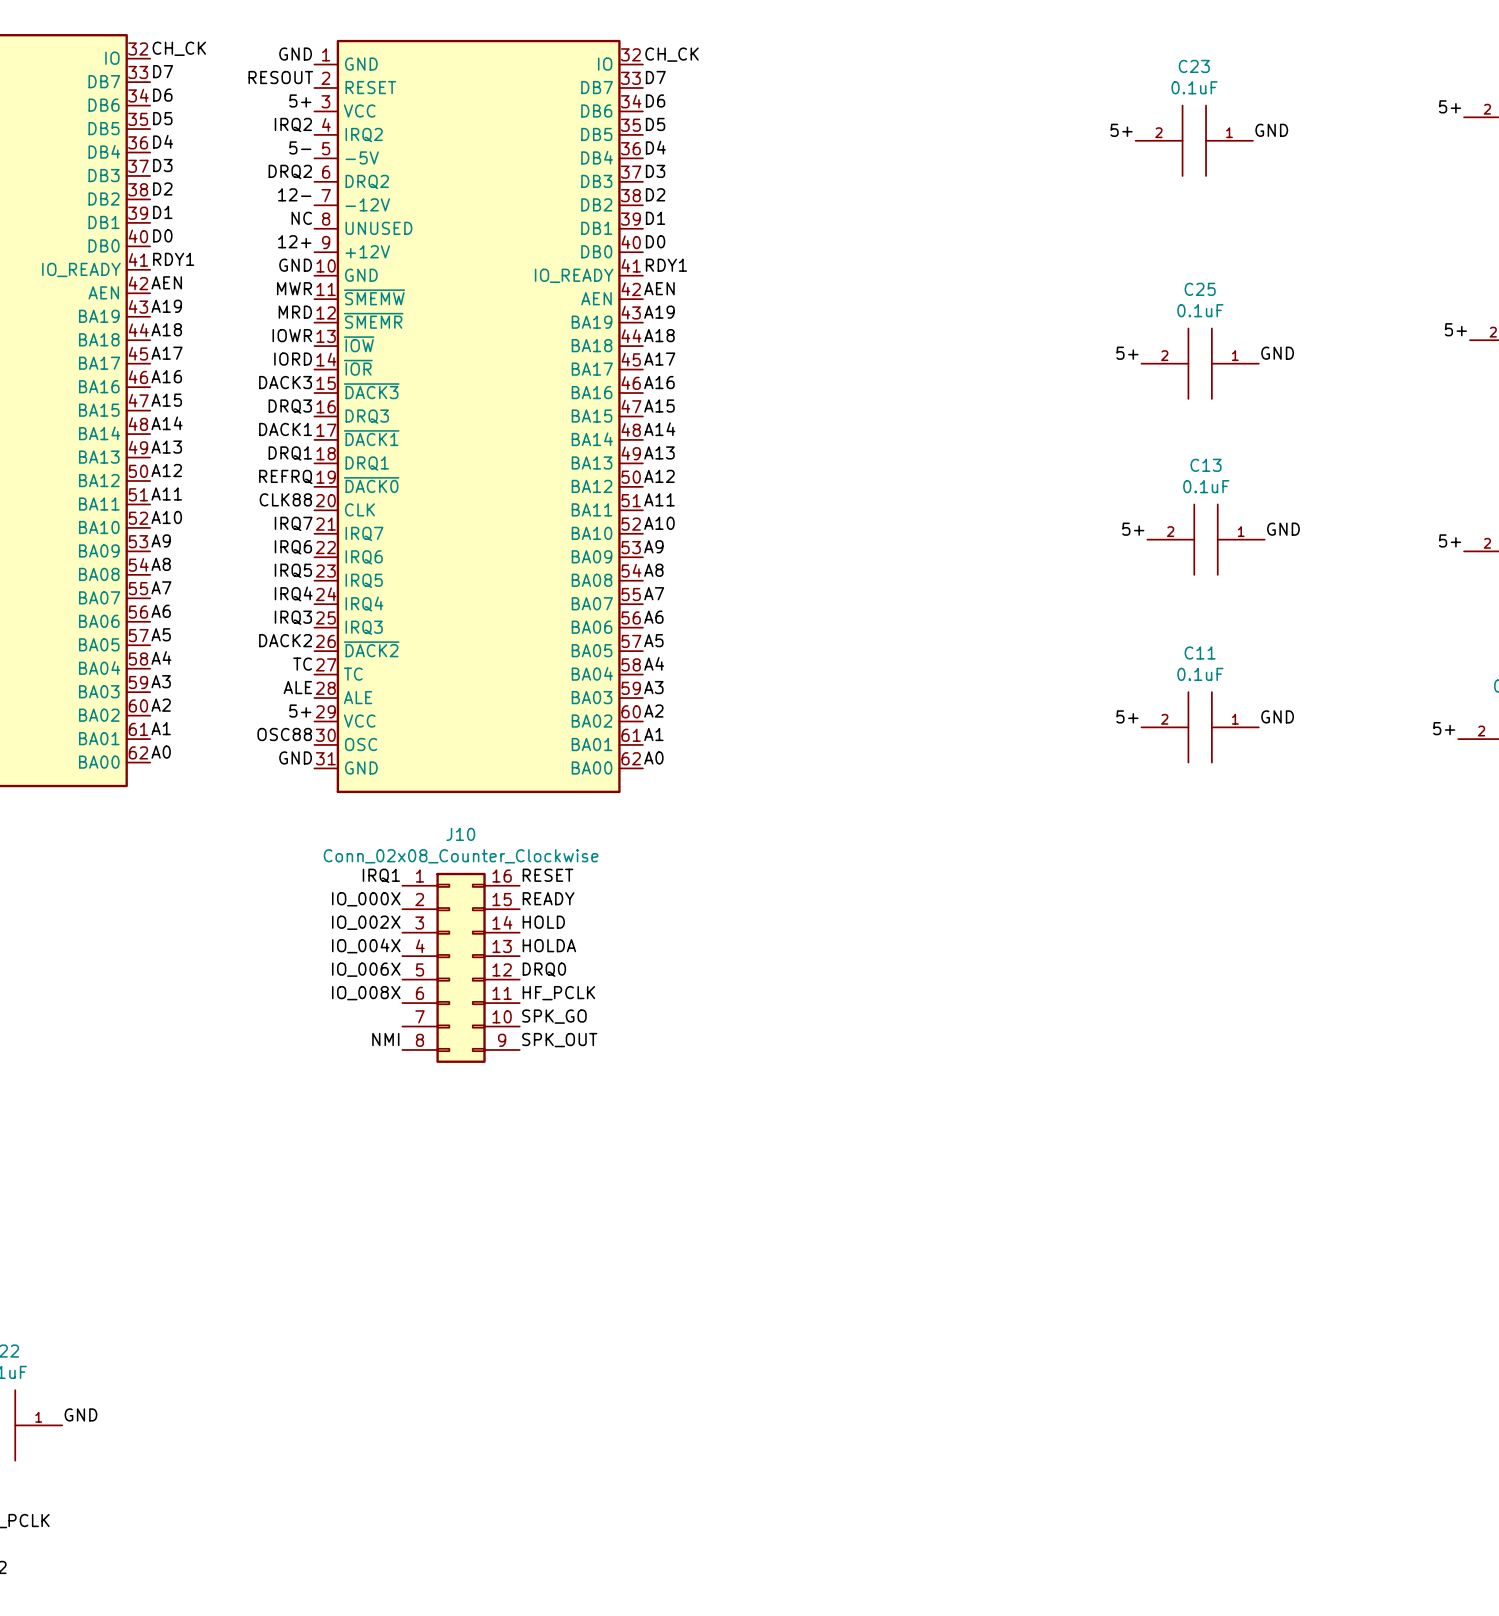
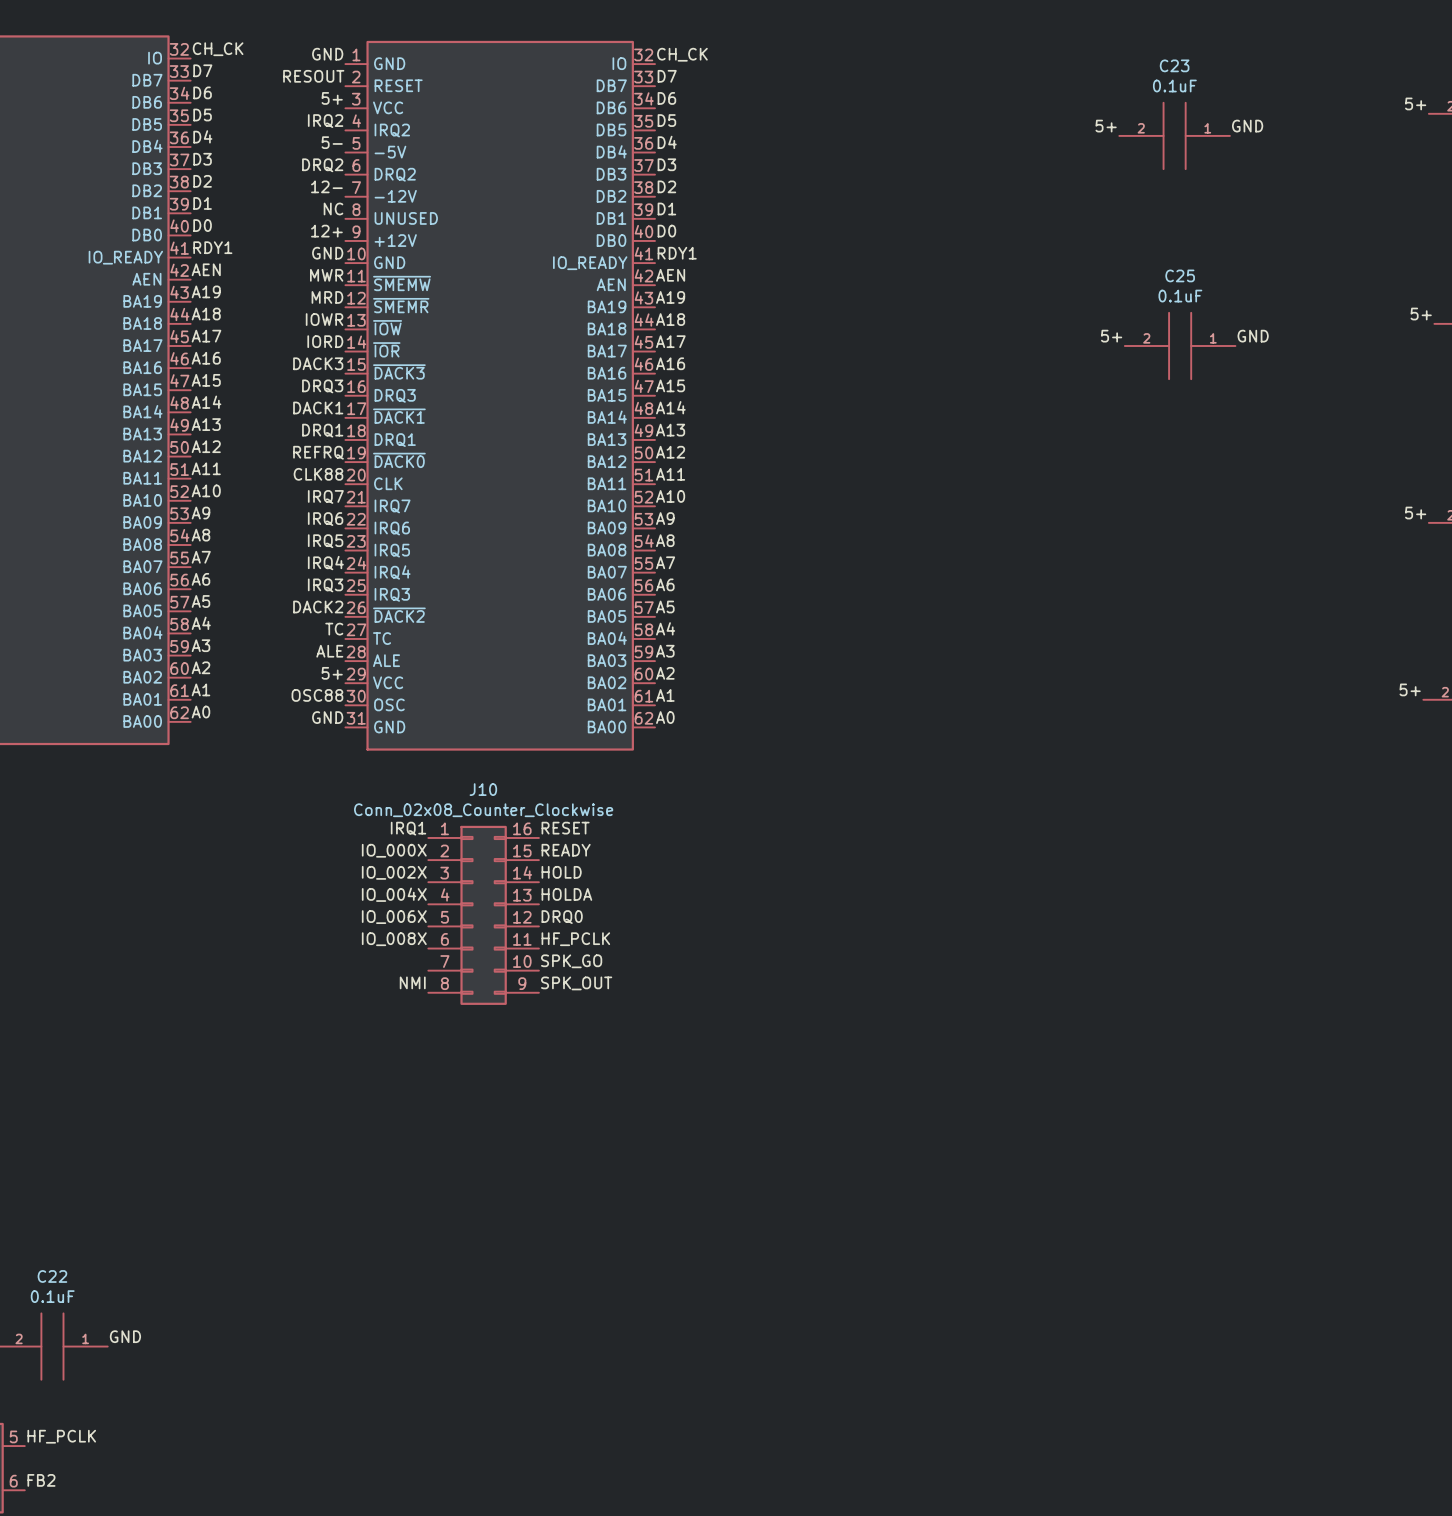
label: 5+ (1133, 529) -> none
label: GND (1283, 529) -> none
C13: 0.1uF (1206, 539) -> none
label: 5+ (1127, 716) -> none
label: GND (1277, 716) -> none
C11: 0.1uF (1200, 727) -> none

